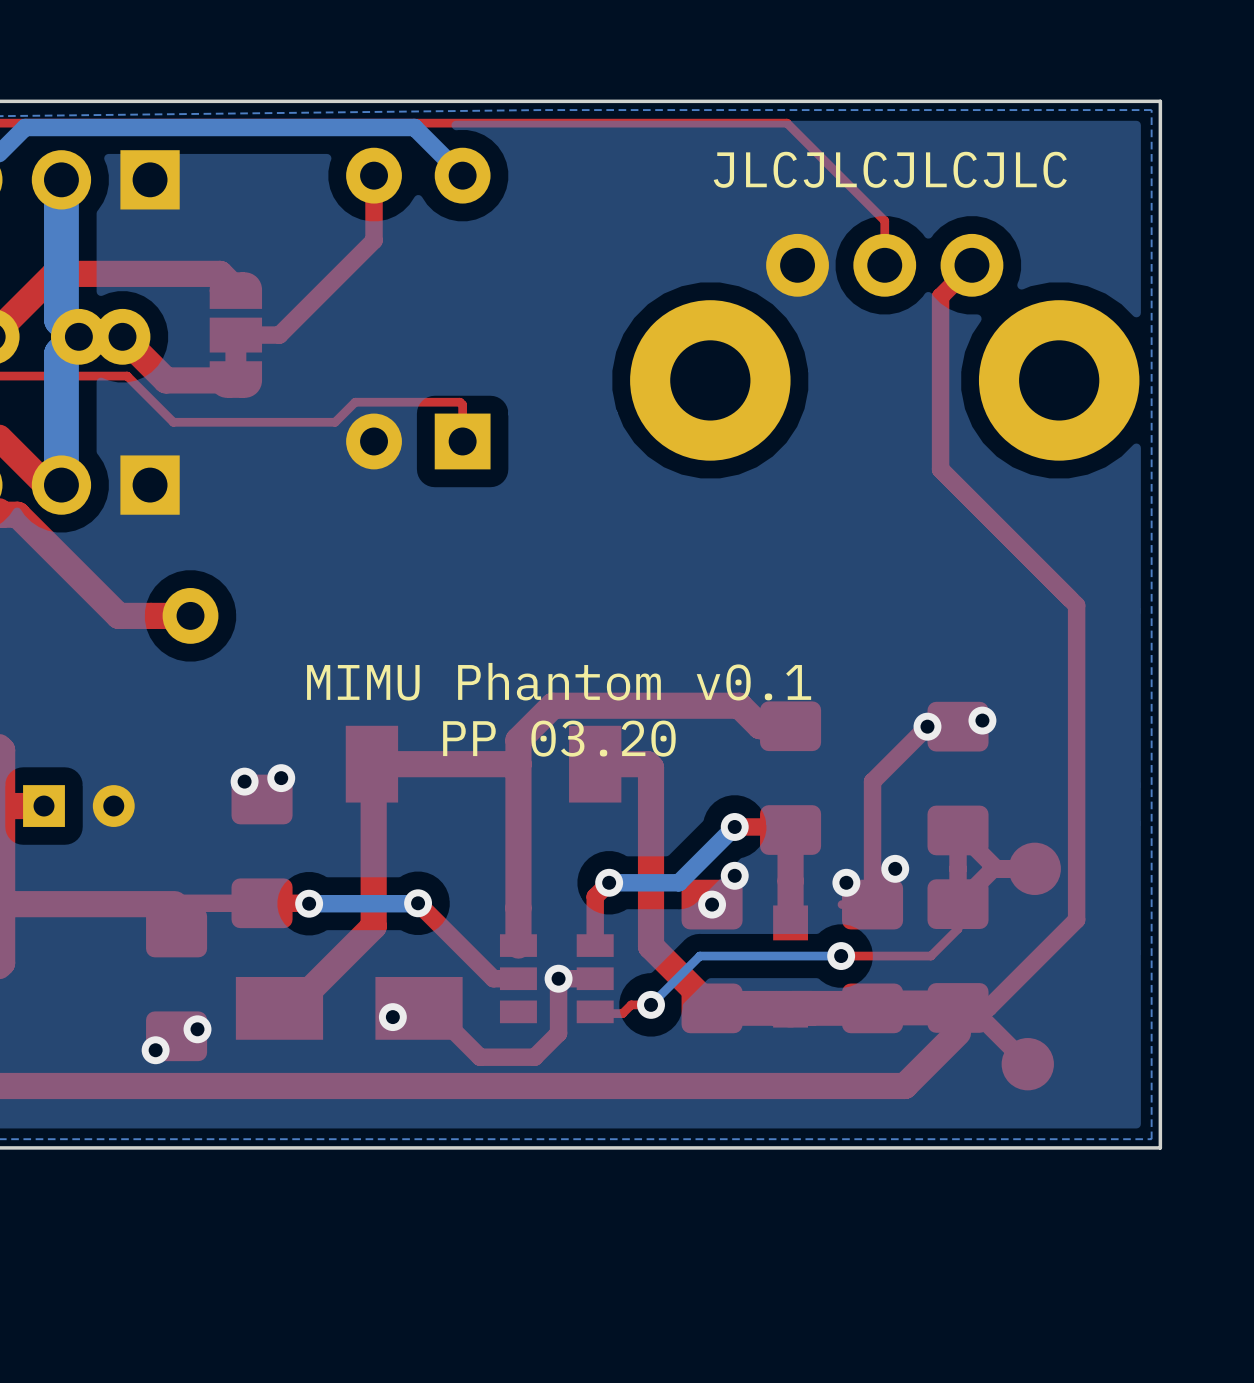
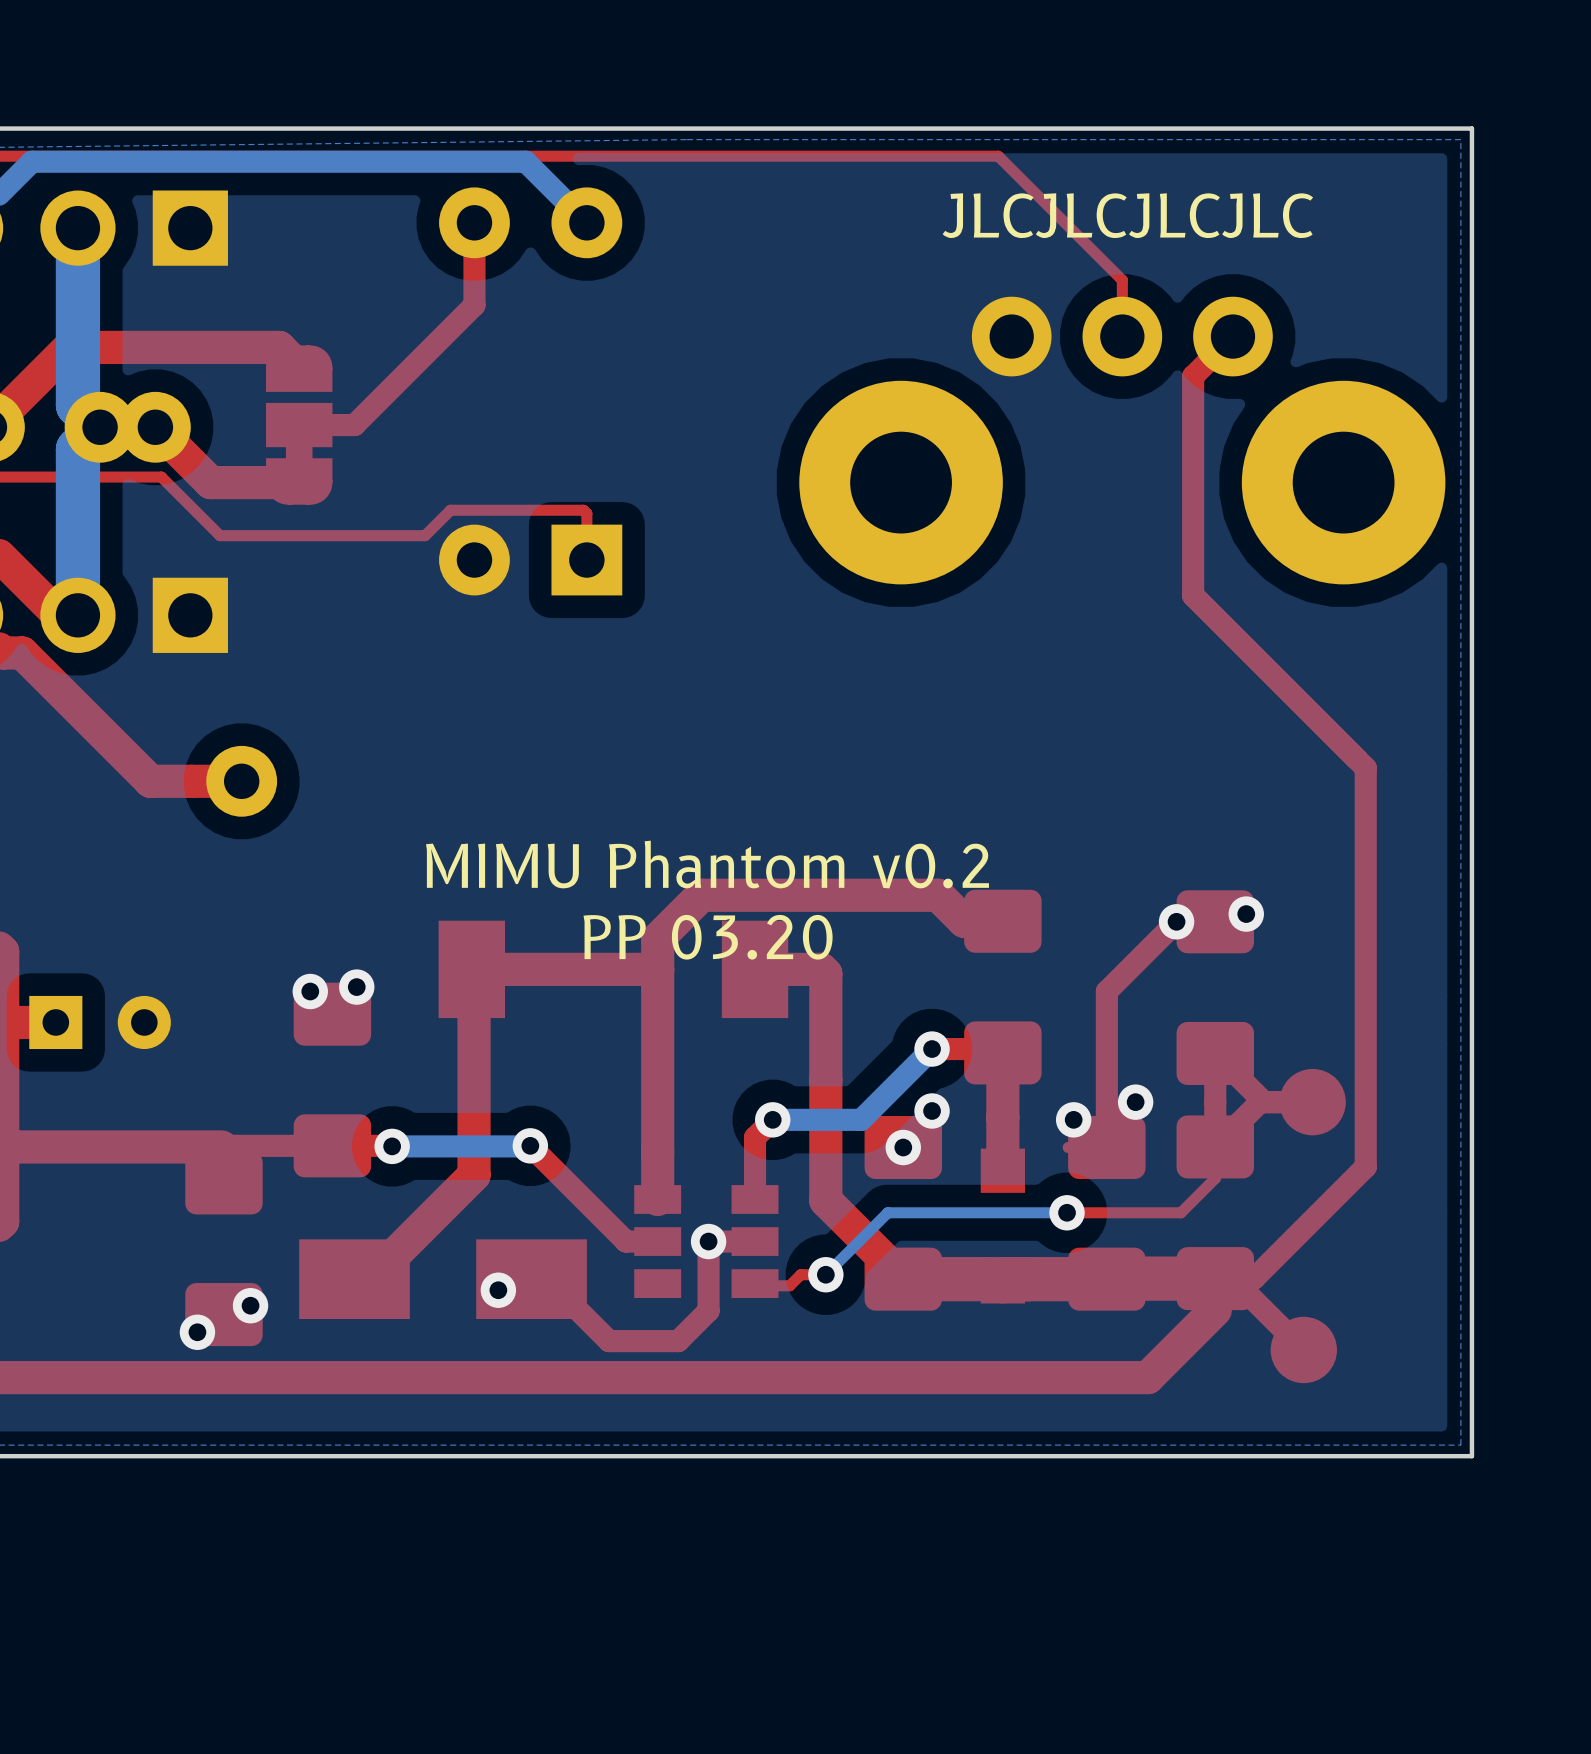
text: MIMU Phantom v0.1 (559, 681) -> MIMU Phantom v0.2 (707, 864)

